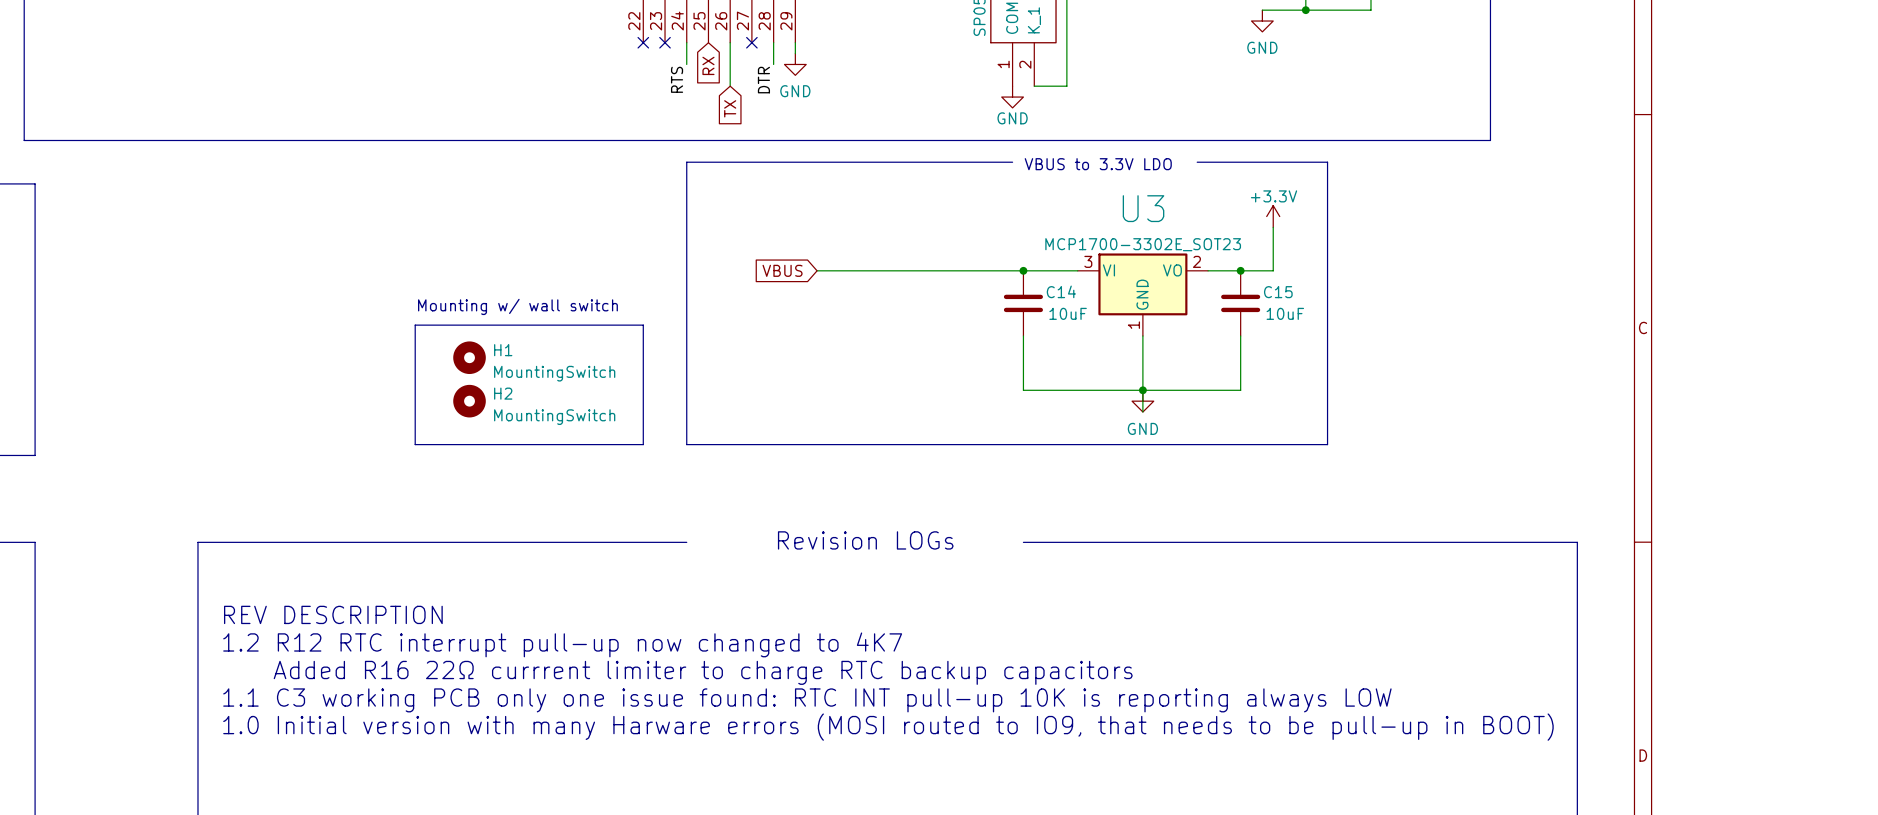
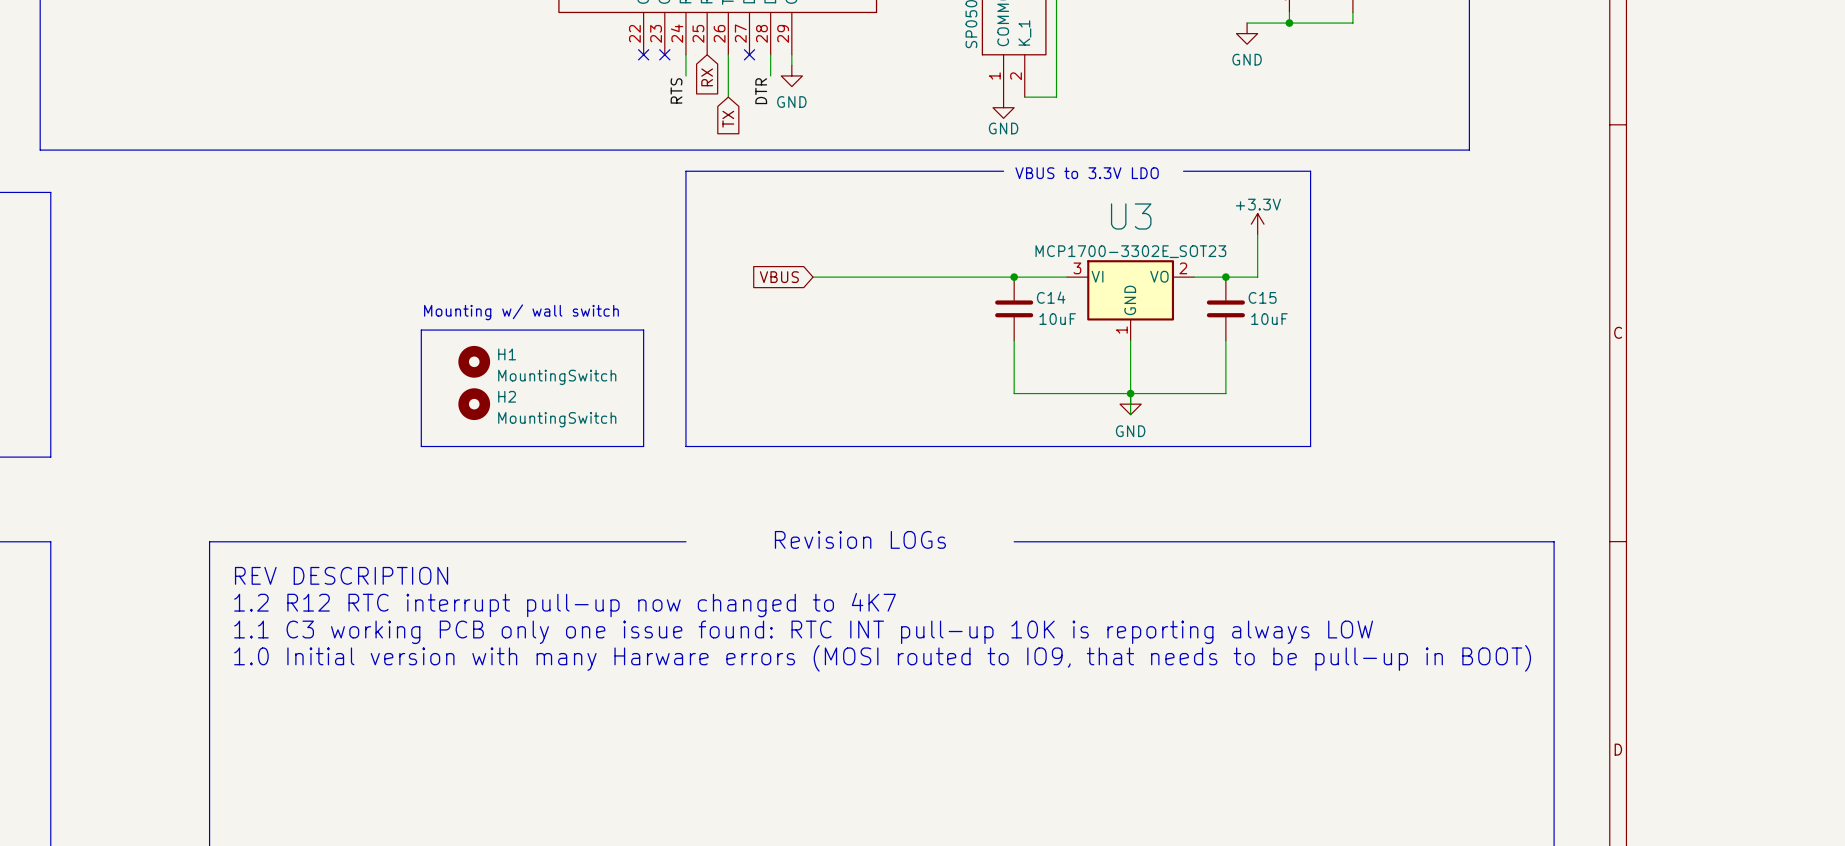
text position: REV DESCRIPTION (333, 614) -> REV DESCRIPTION (341, 575)
text position: 1.2 R12 RTC interrupt pull-up now changed to 4K7 (562, 644) -> 1.2 R12 RTC interrupt pull-up now changed to 4K7 (565, 605)
text: Added R16 22Ω currrent limiter to charge RTC backup capacitors (703, 672) -> none
text position: 1.1 C3 working PCB only one issue found: RTC INT pull-up 10K is reporting always LOW (807, 700) -> 1.1 C3 working PCB only one issue found: RTC INT pull-up 10K is reporting always LOW (803, 632)
text position: 1.0 Initial version with many Harware errors (MOSI routed to IO9, that needs to be pull-up in BOOT) (888, 727) -> 1.0 Initial version with many Harware errors (MOSI routed to IO9, that needs to be pull-up in BOOT) (882, 658)

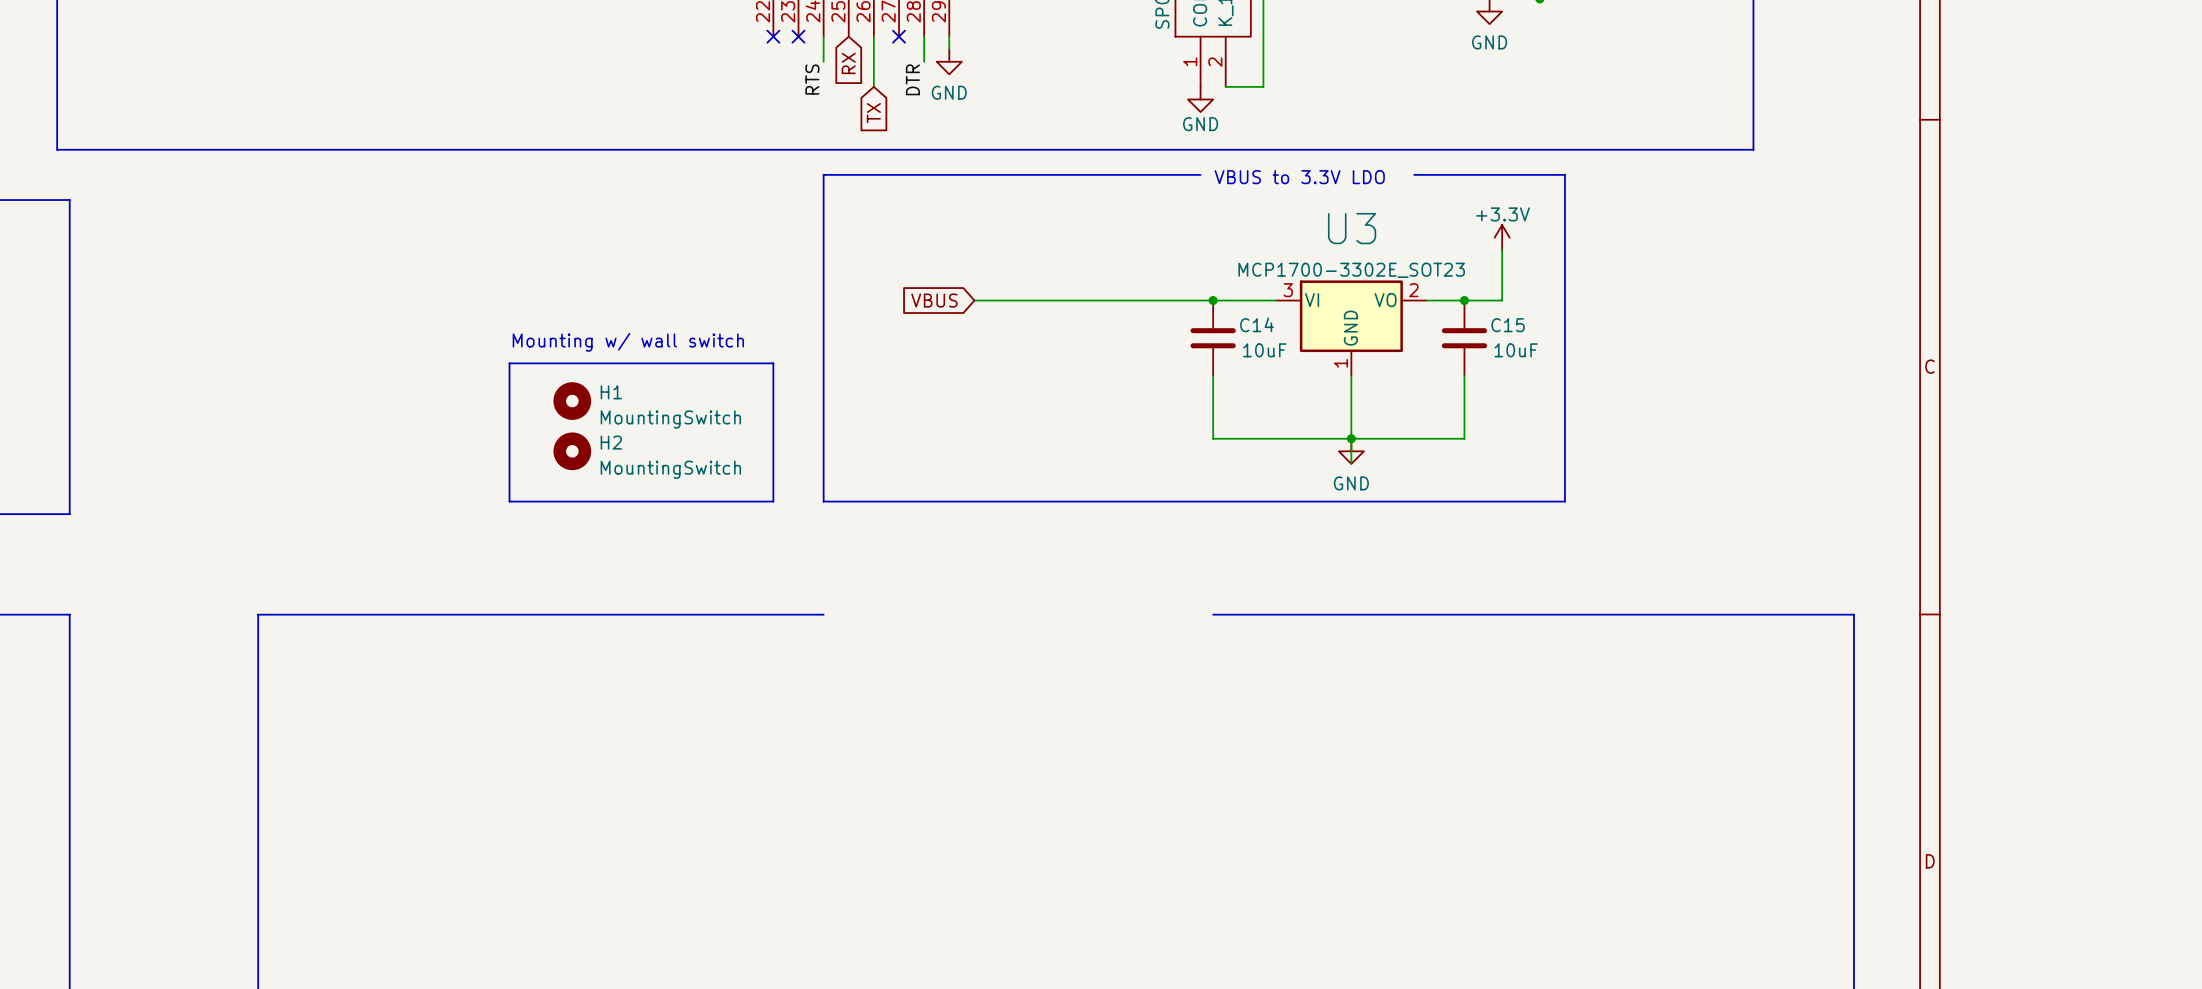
text: Revision LOGs (860, 539) -> none
text: REV DESCRIPTION (341, 575) -> none
text: 1.2 R12 RTC interrupt pull-up now changed to 4K7 (565, 605) -> none
text: 1.1 C3 working PCB only one issue found: RTC INT pull-up 10K is reporting always LOW (803, 632) -> none
text: 1.0 Initial version with many Harware errors (MOSI routed to IO9, that needs to be pull-up in BOOT) (882, 658) -> none

